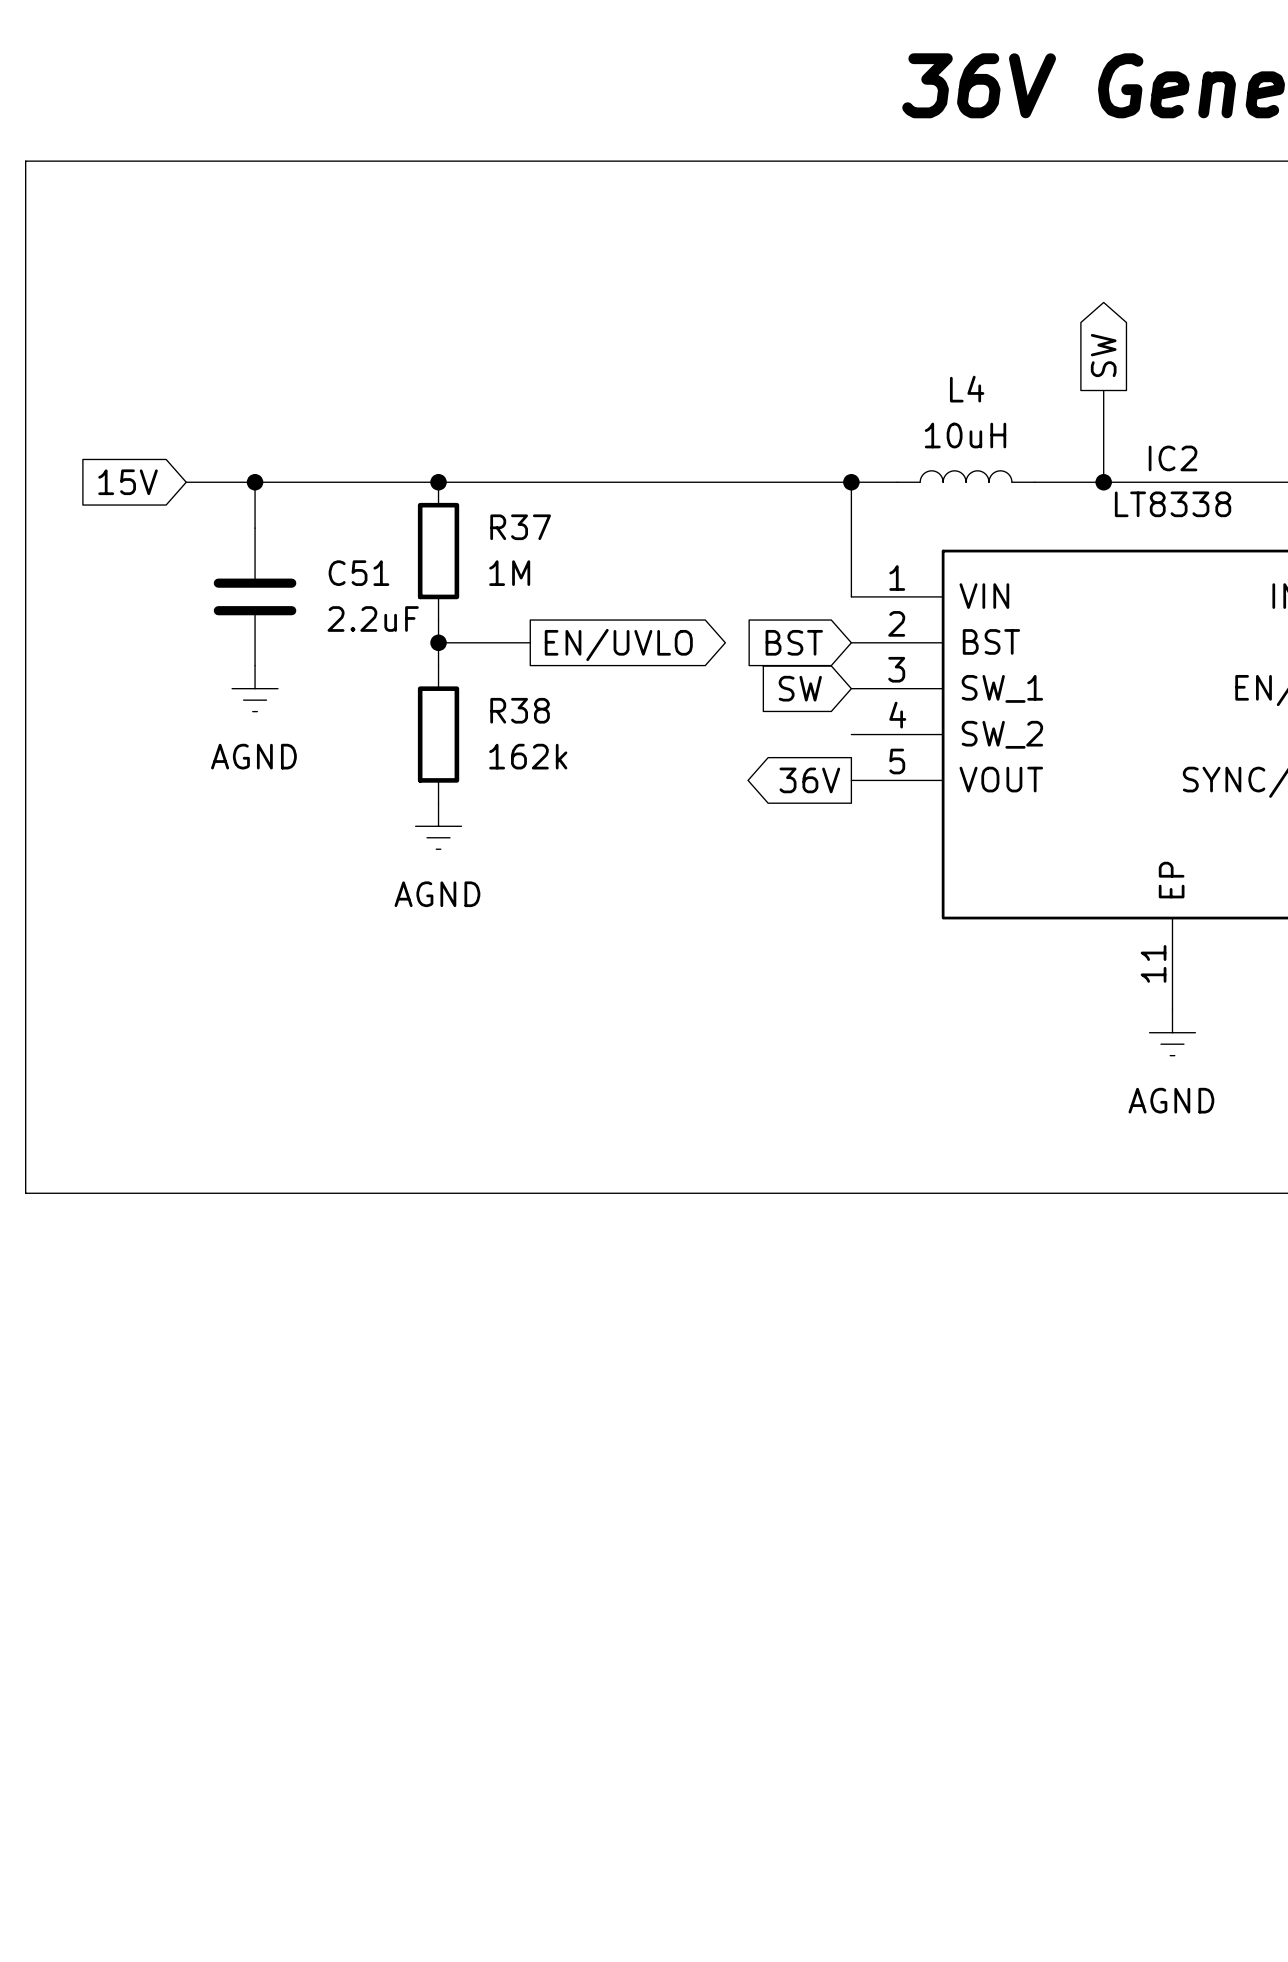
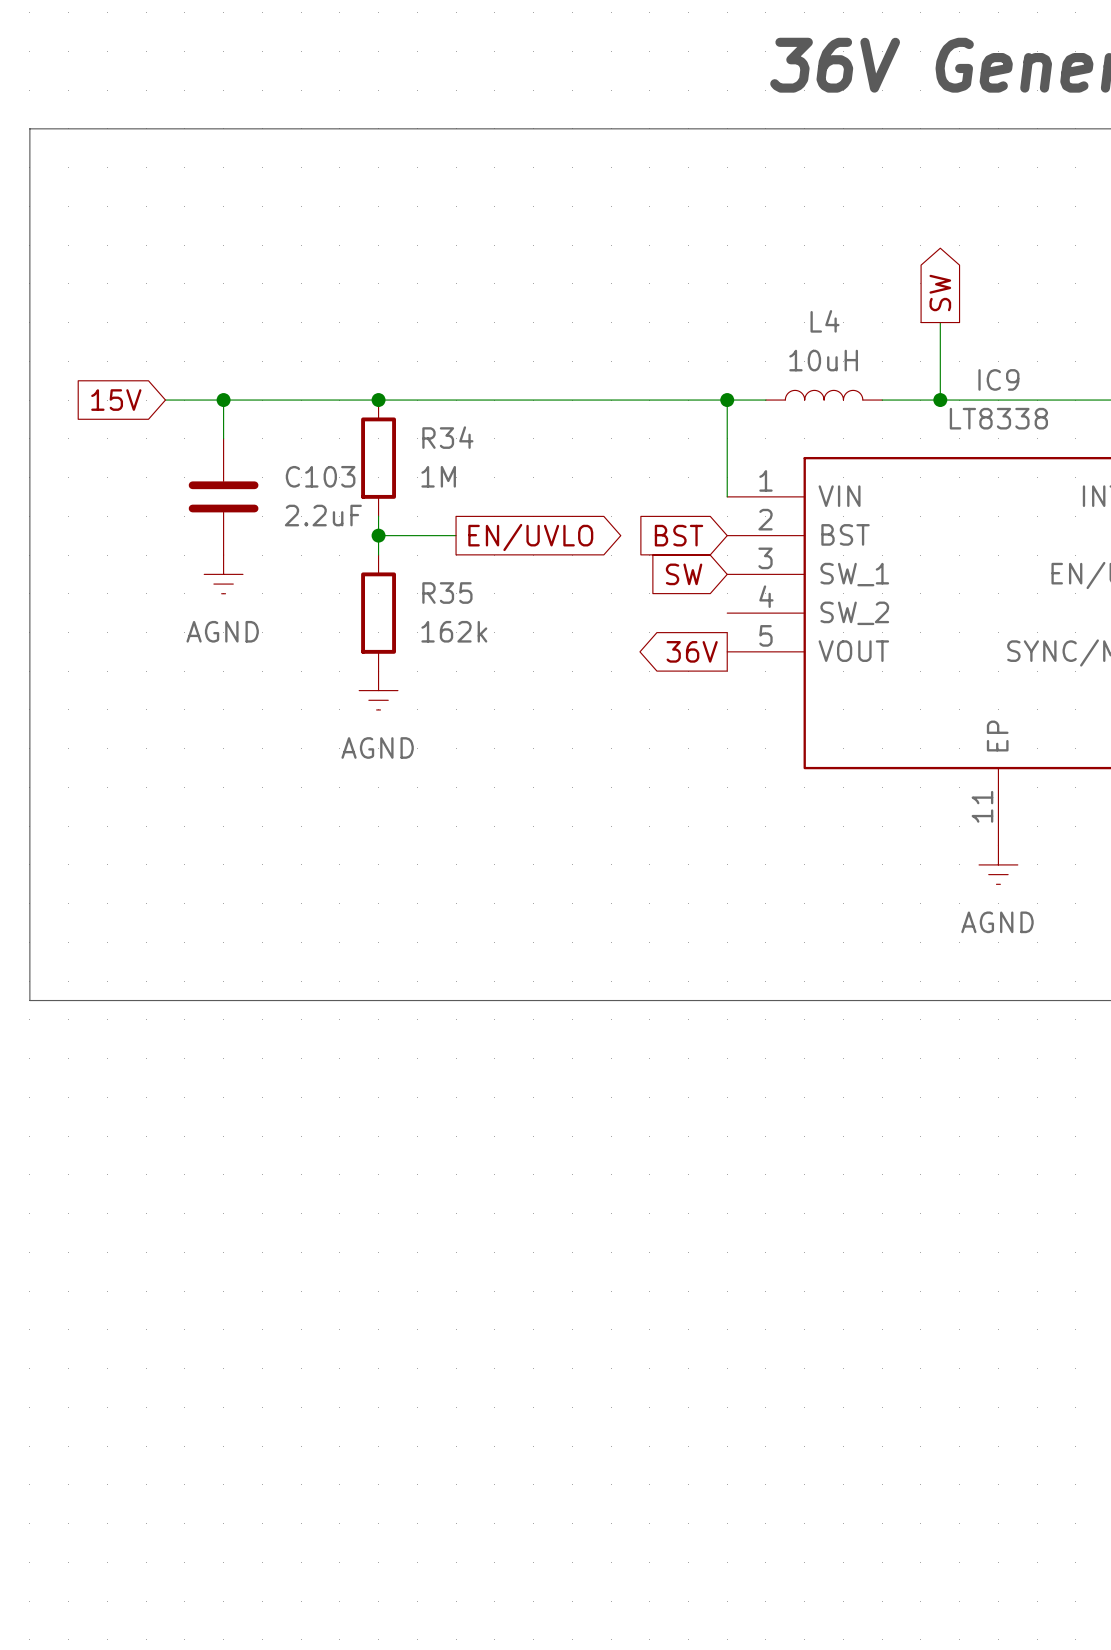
IC2 name: IC2 (1173, 458) -> IC9 (998, 379)
R37 name: R37 (520, 527) -> R34 (447, 437)
C51 name: C51 (358, 573) -> C103 (320, 476)
R38 name: R38 (520, 710) -> R35 (447, 593)

